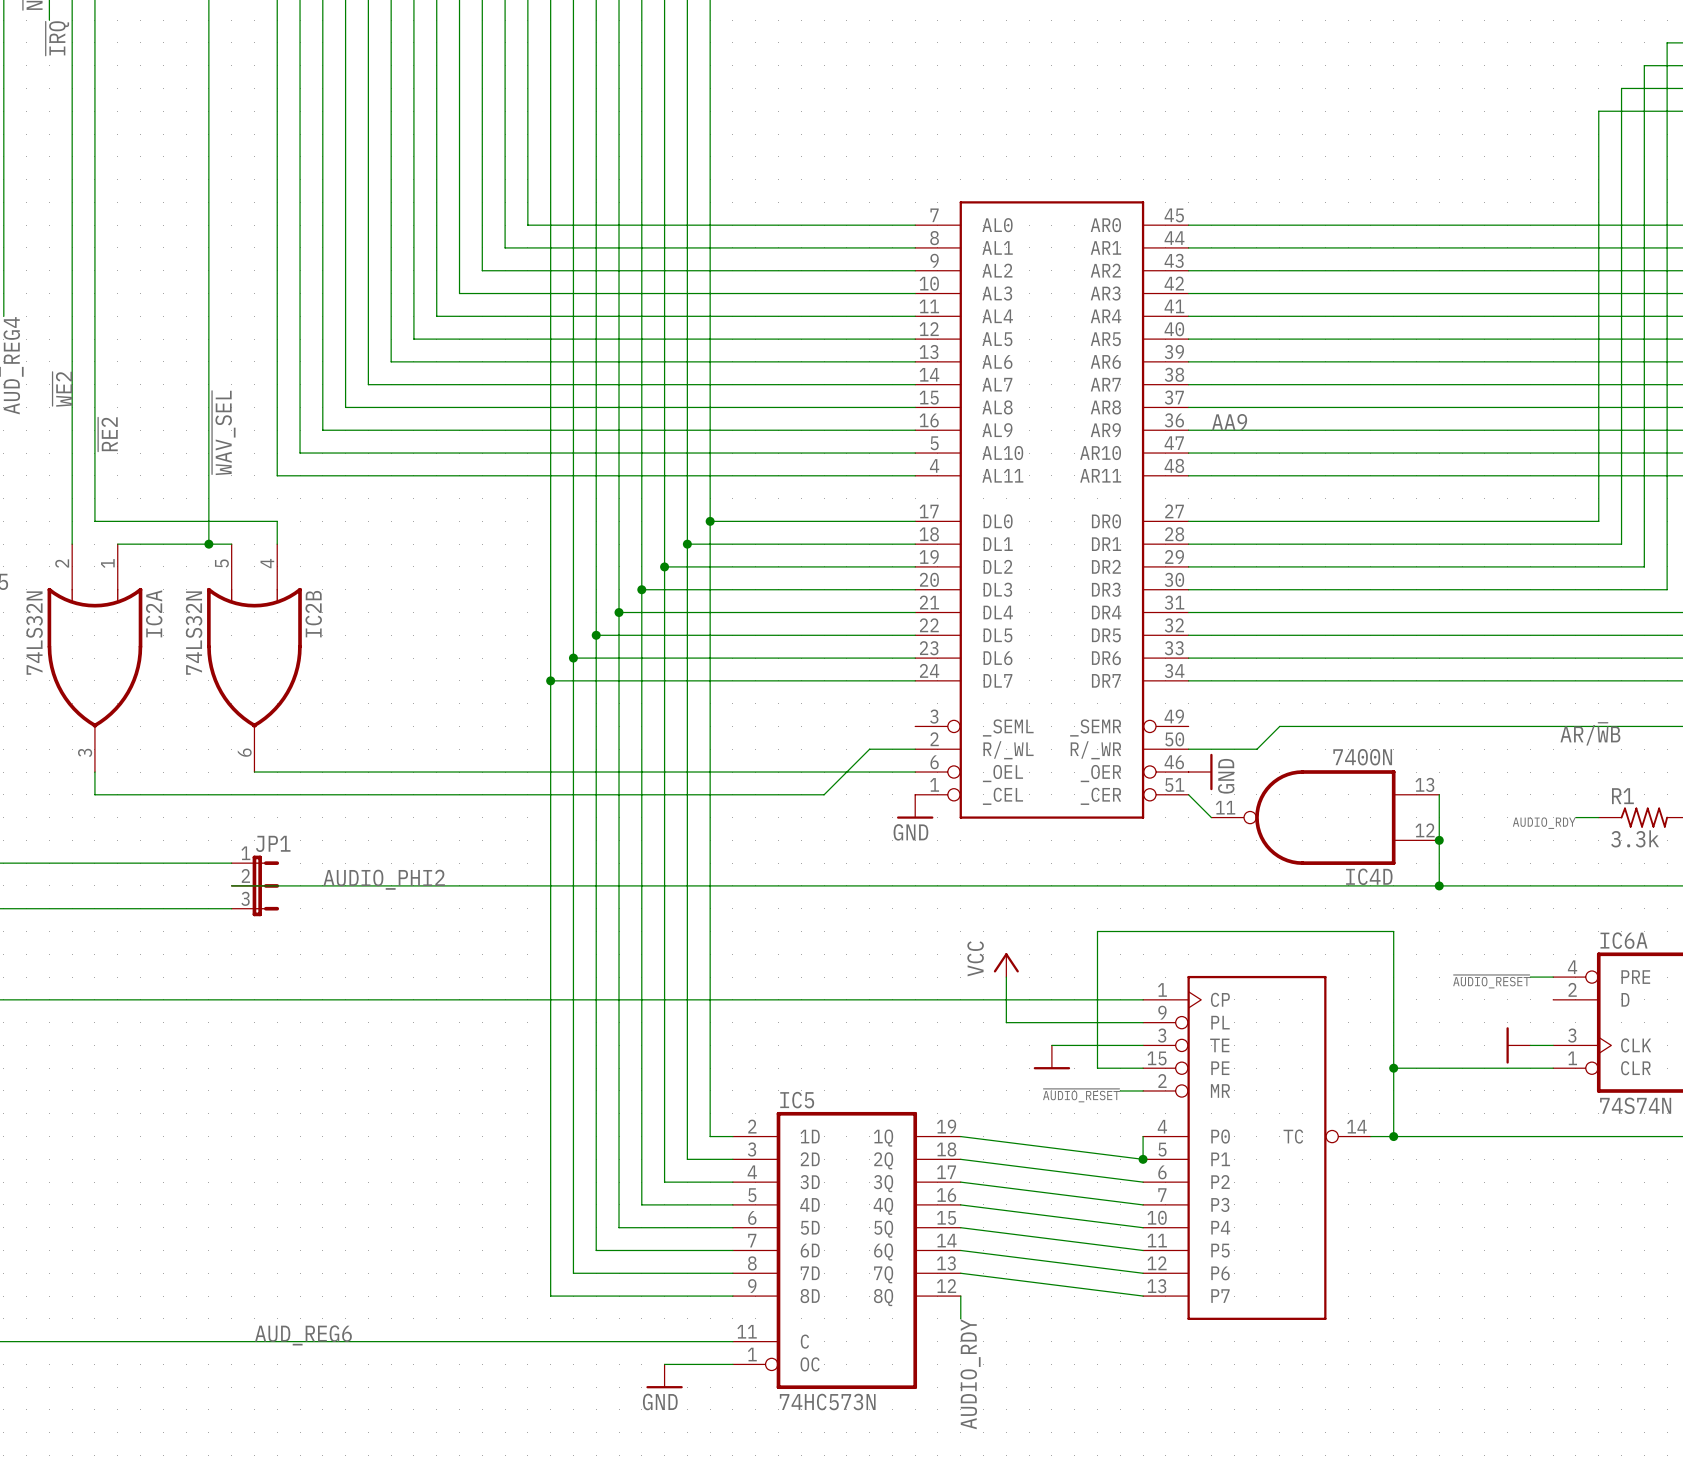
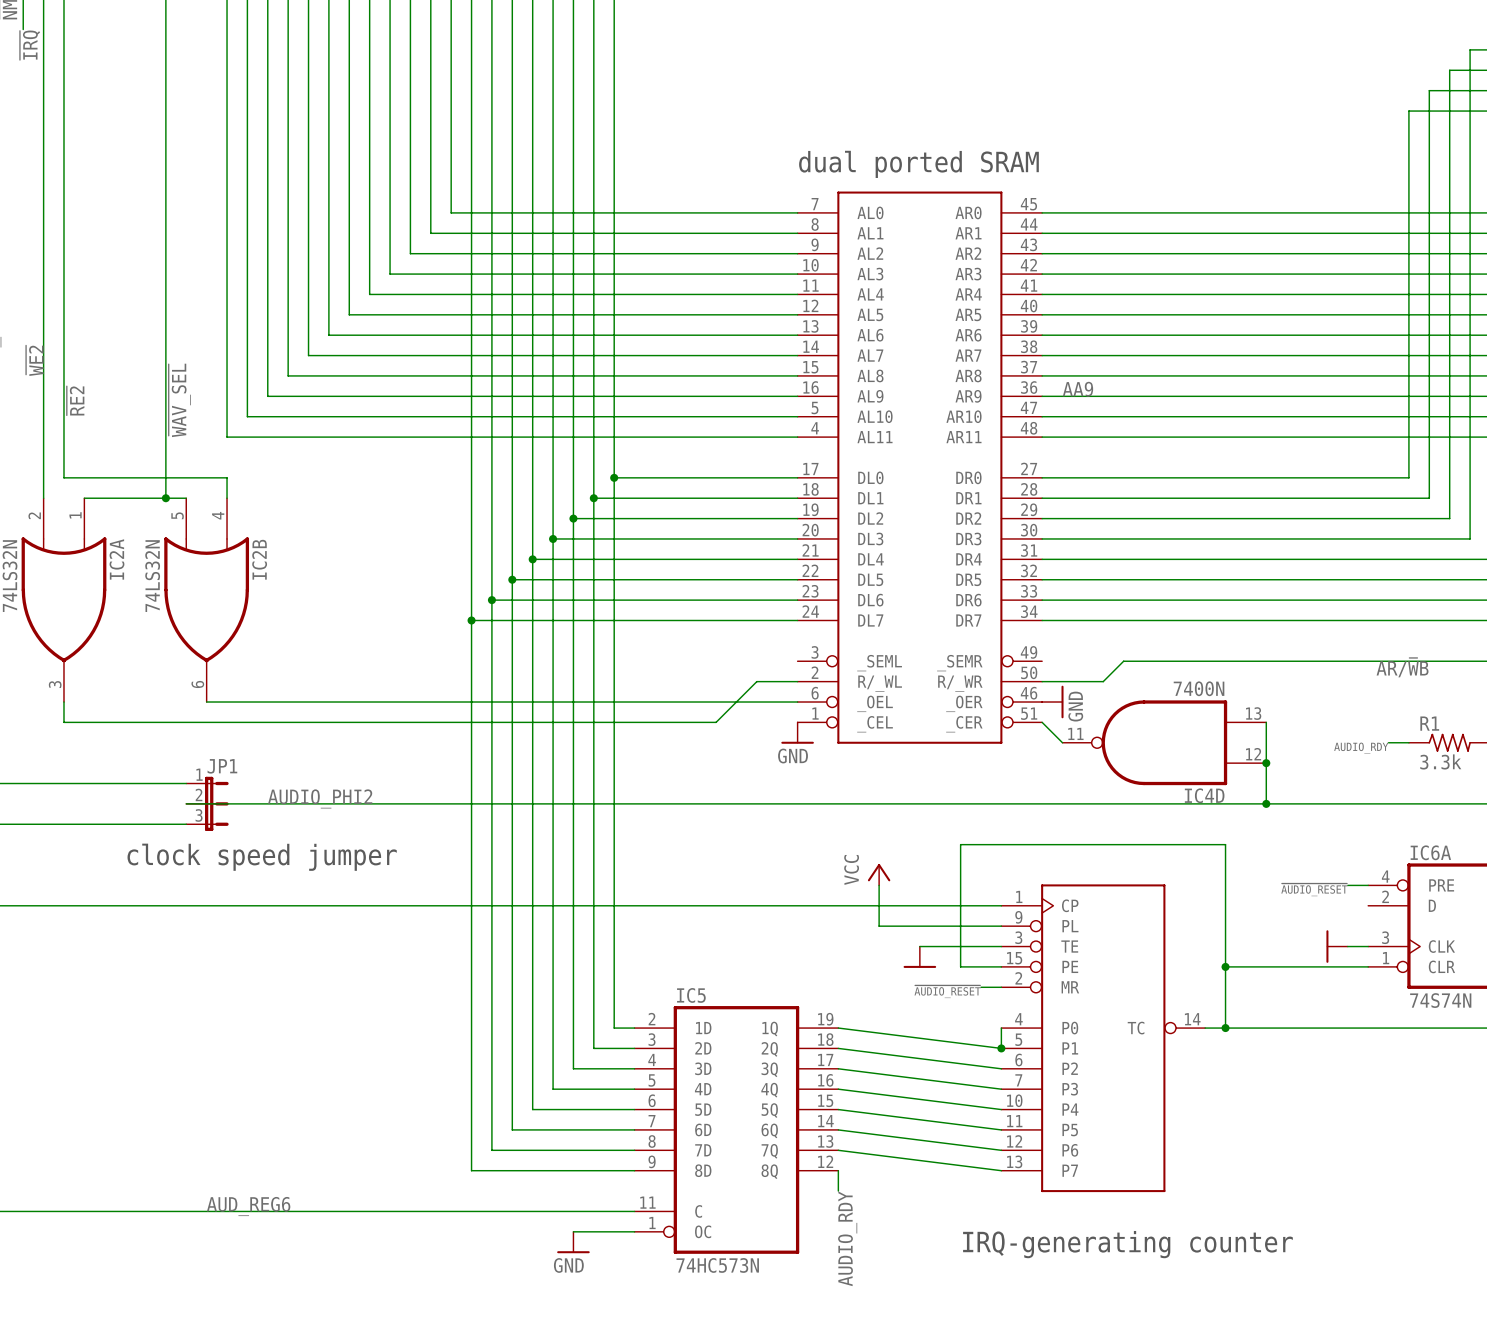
text: none -> dual ported SRAM (918, 164)
text: none -> clock speed jumper (262, 857)
text: none -> IRQ-generating counter (1127, 1244)

